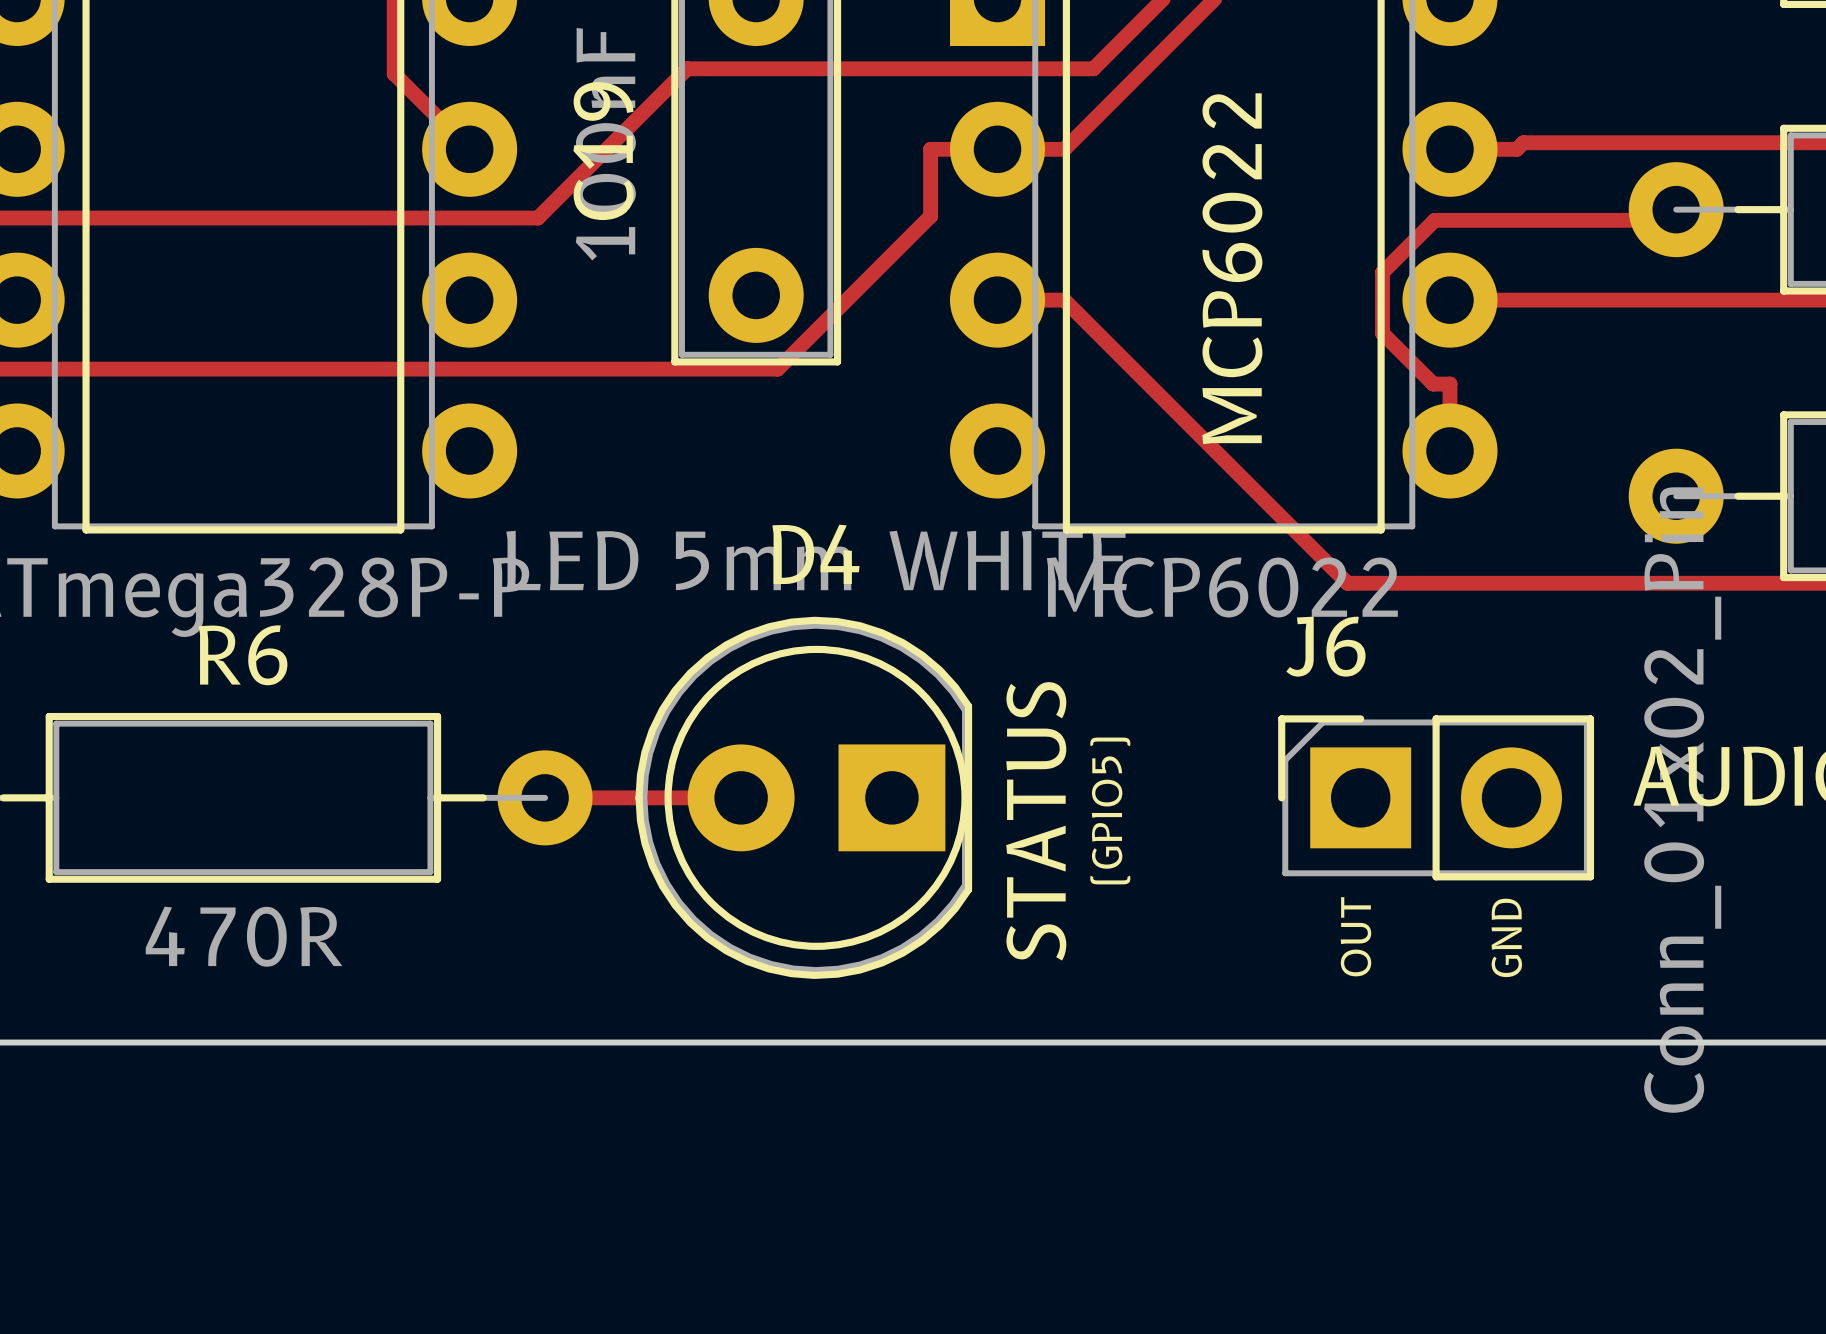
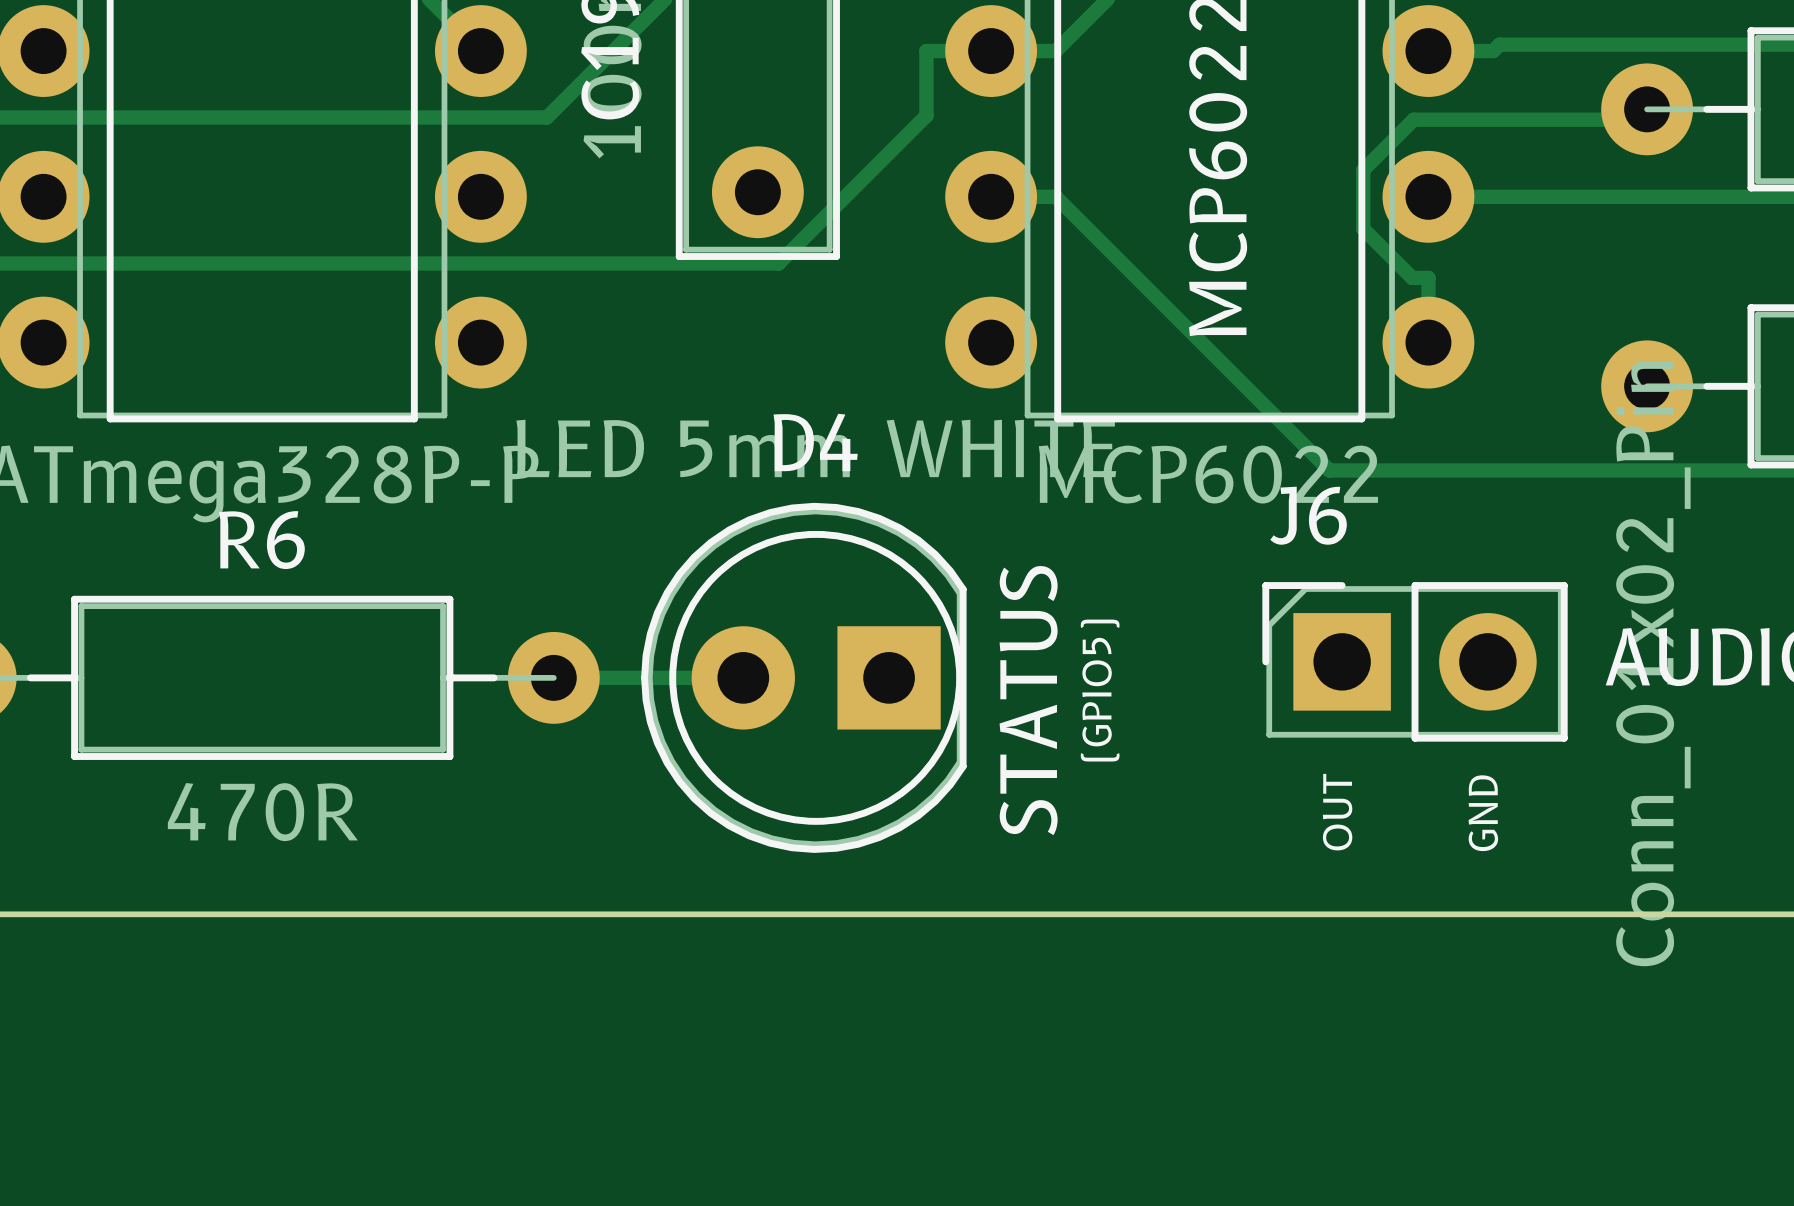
J6 position: (1436, 797) -> (1415, 661)

